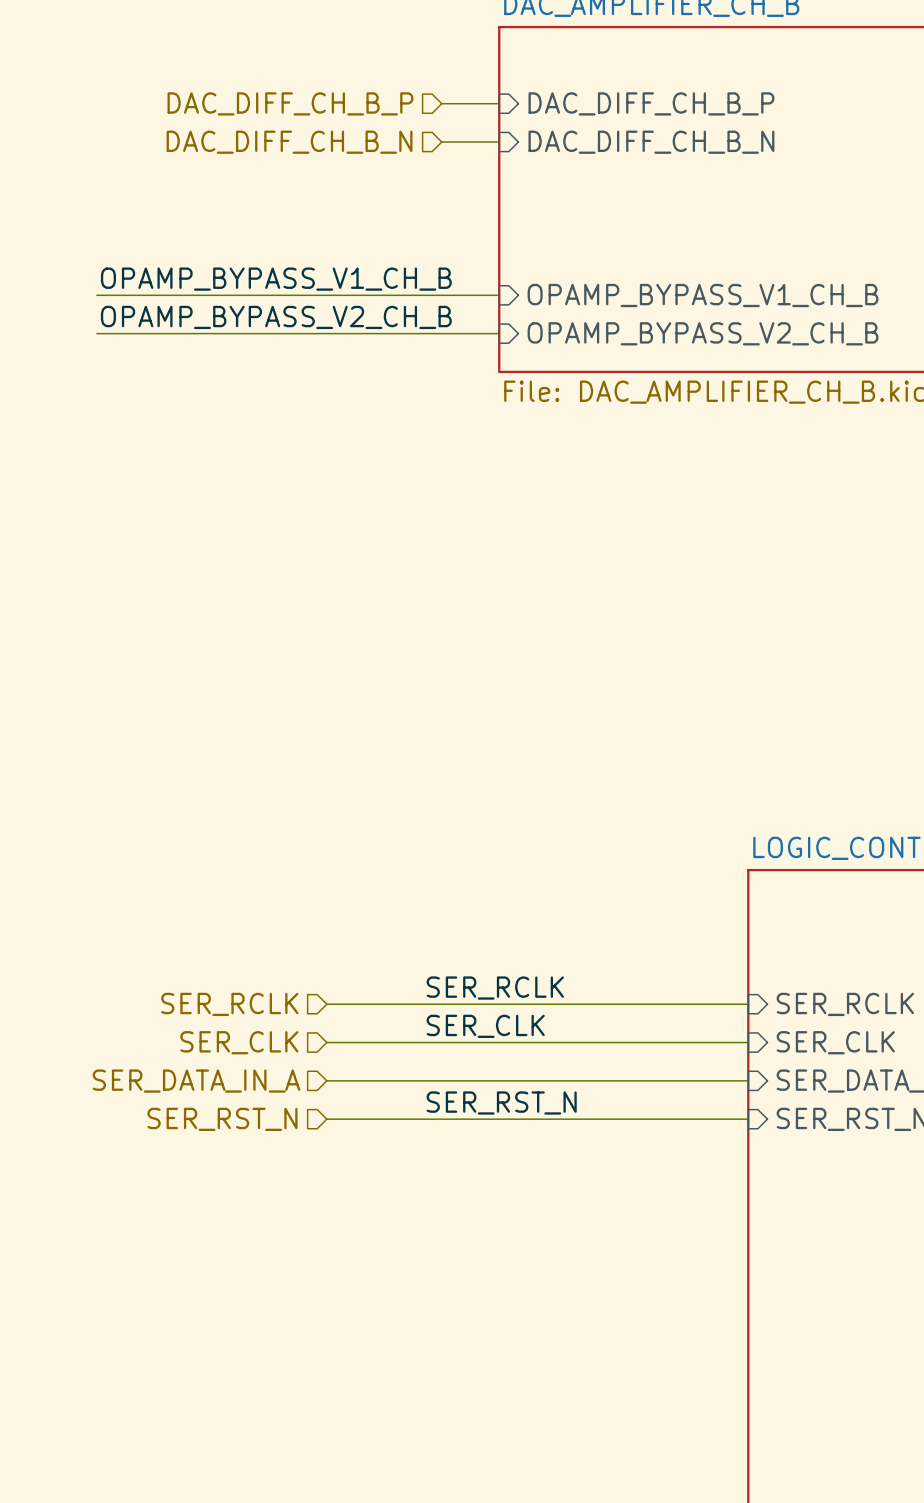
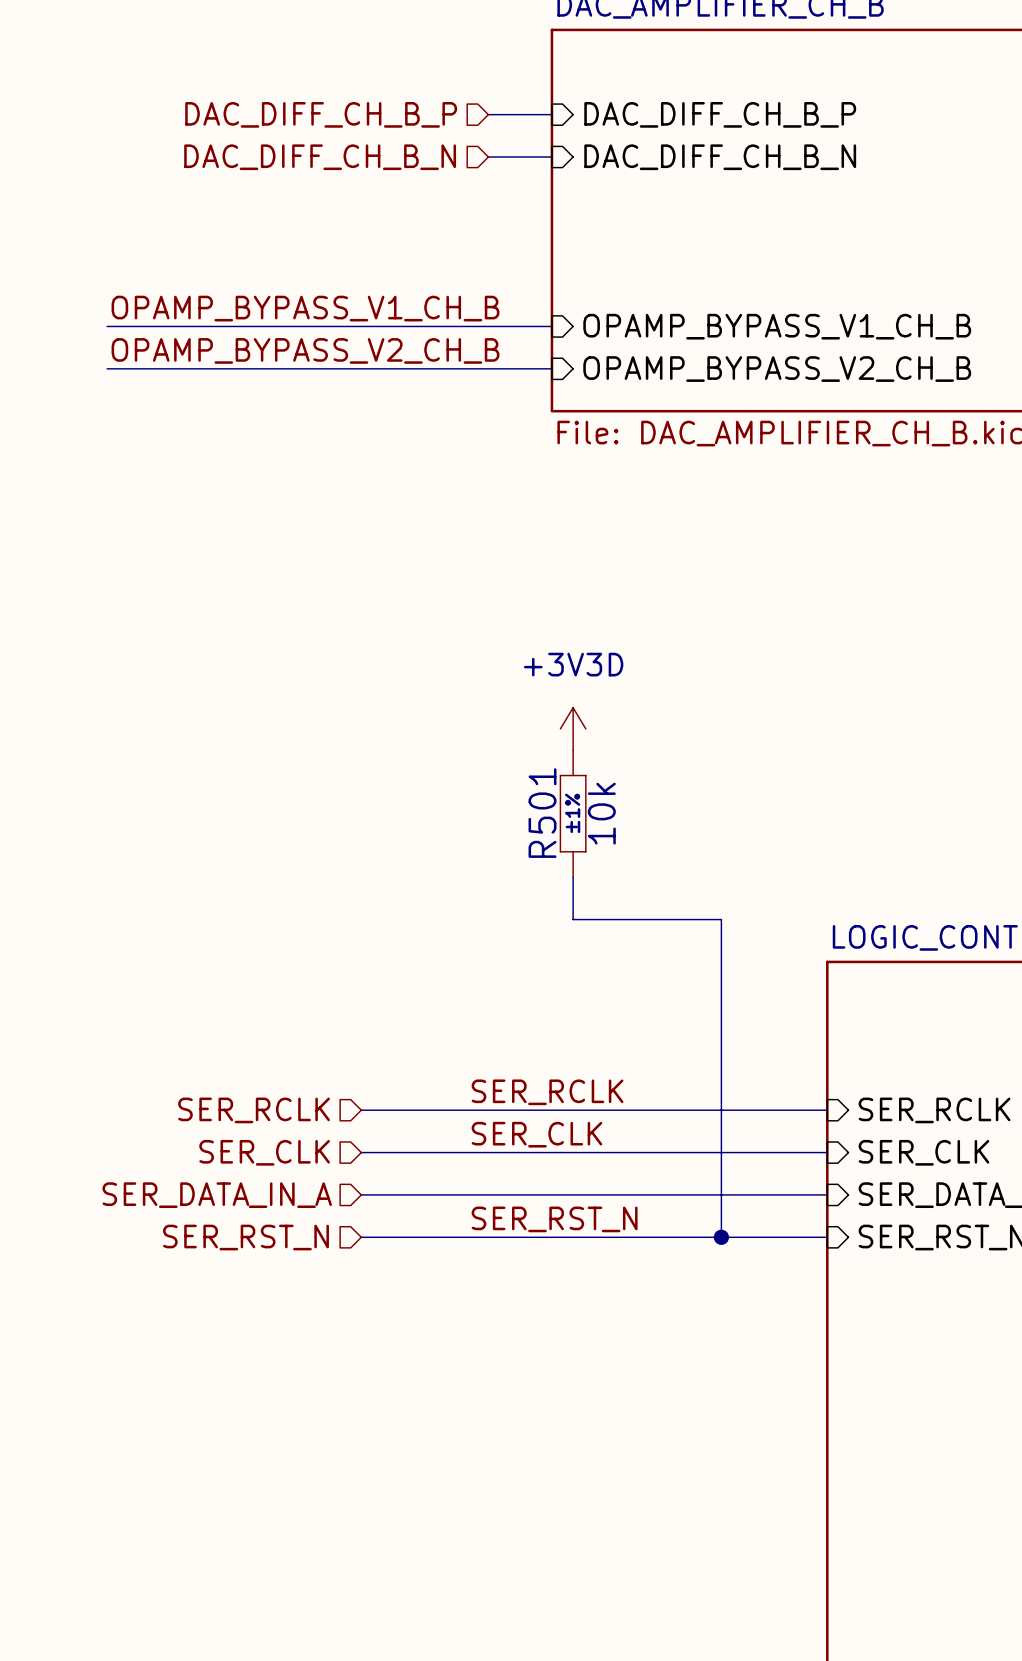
power symbol: none -> +3V3D (573, 728)
R501: none -> 10k (573, 813)
wire: none -> (573, 877) (573, 919) (721, 919) (721, 1237)
junction: none -> (721, 1237)

